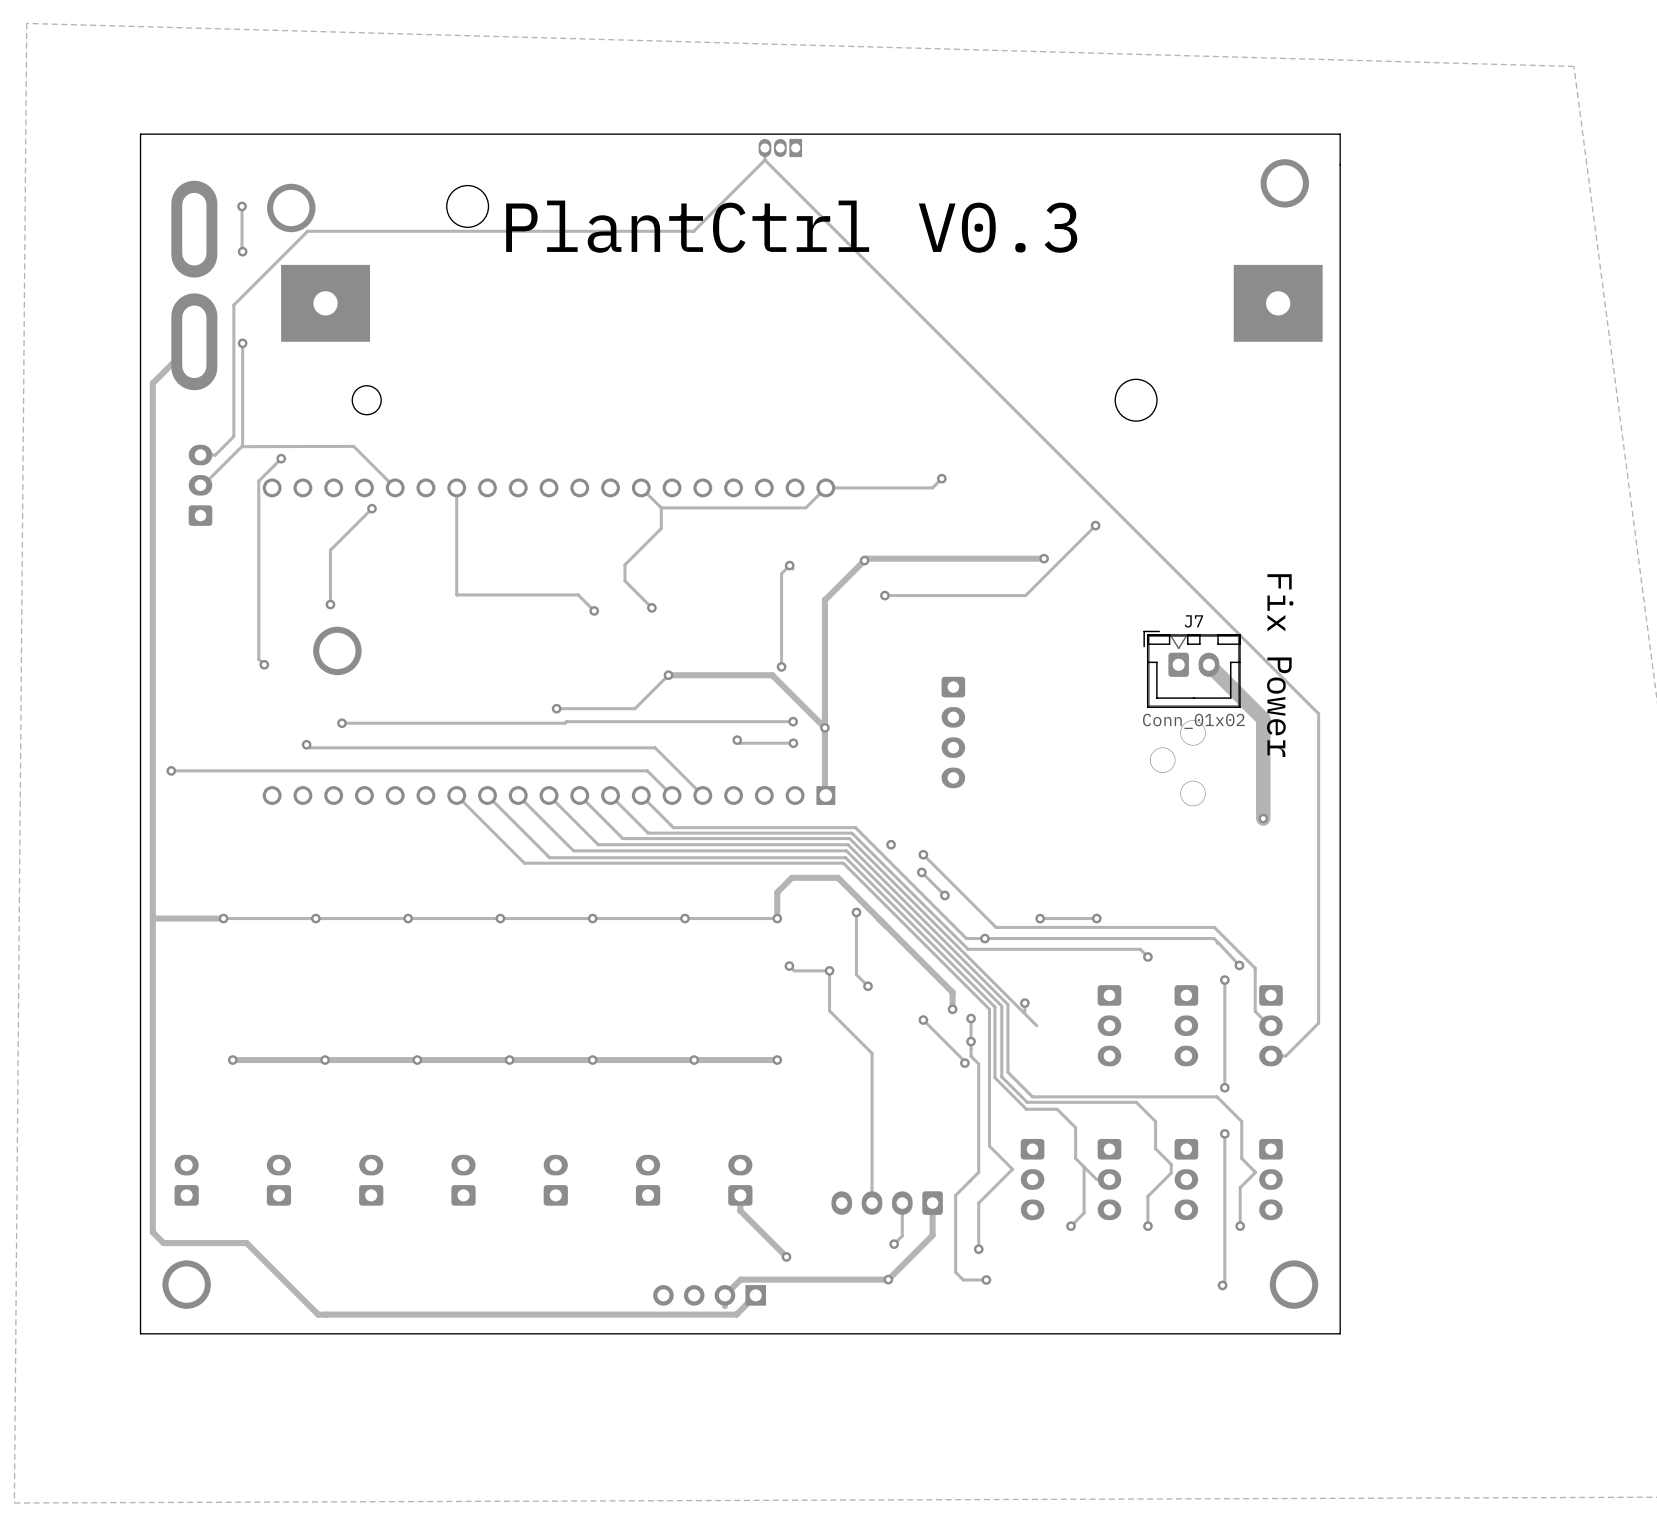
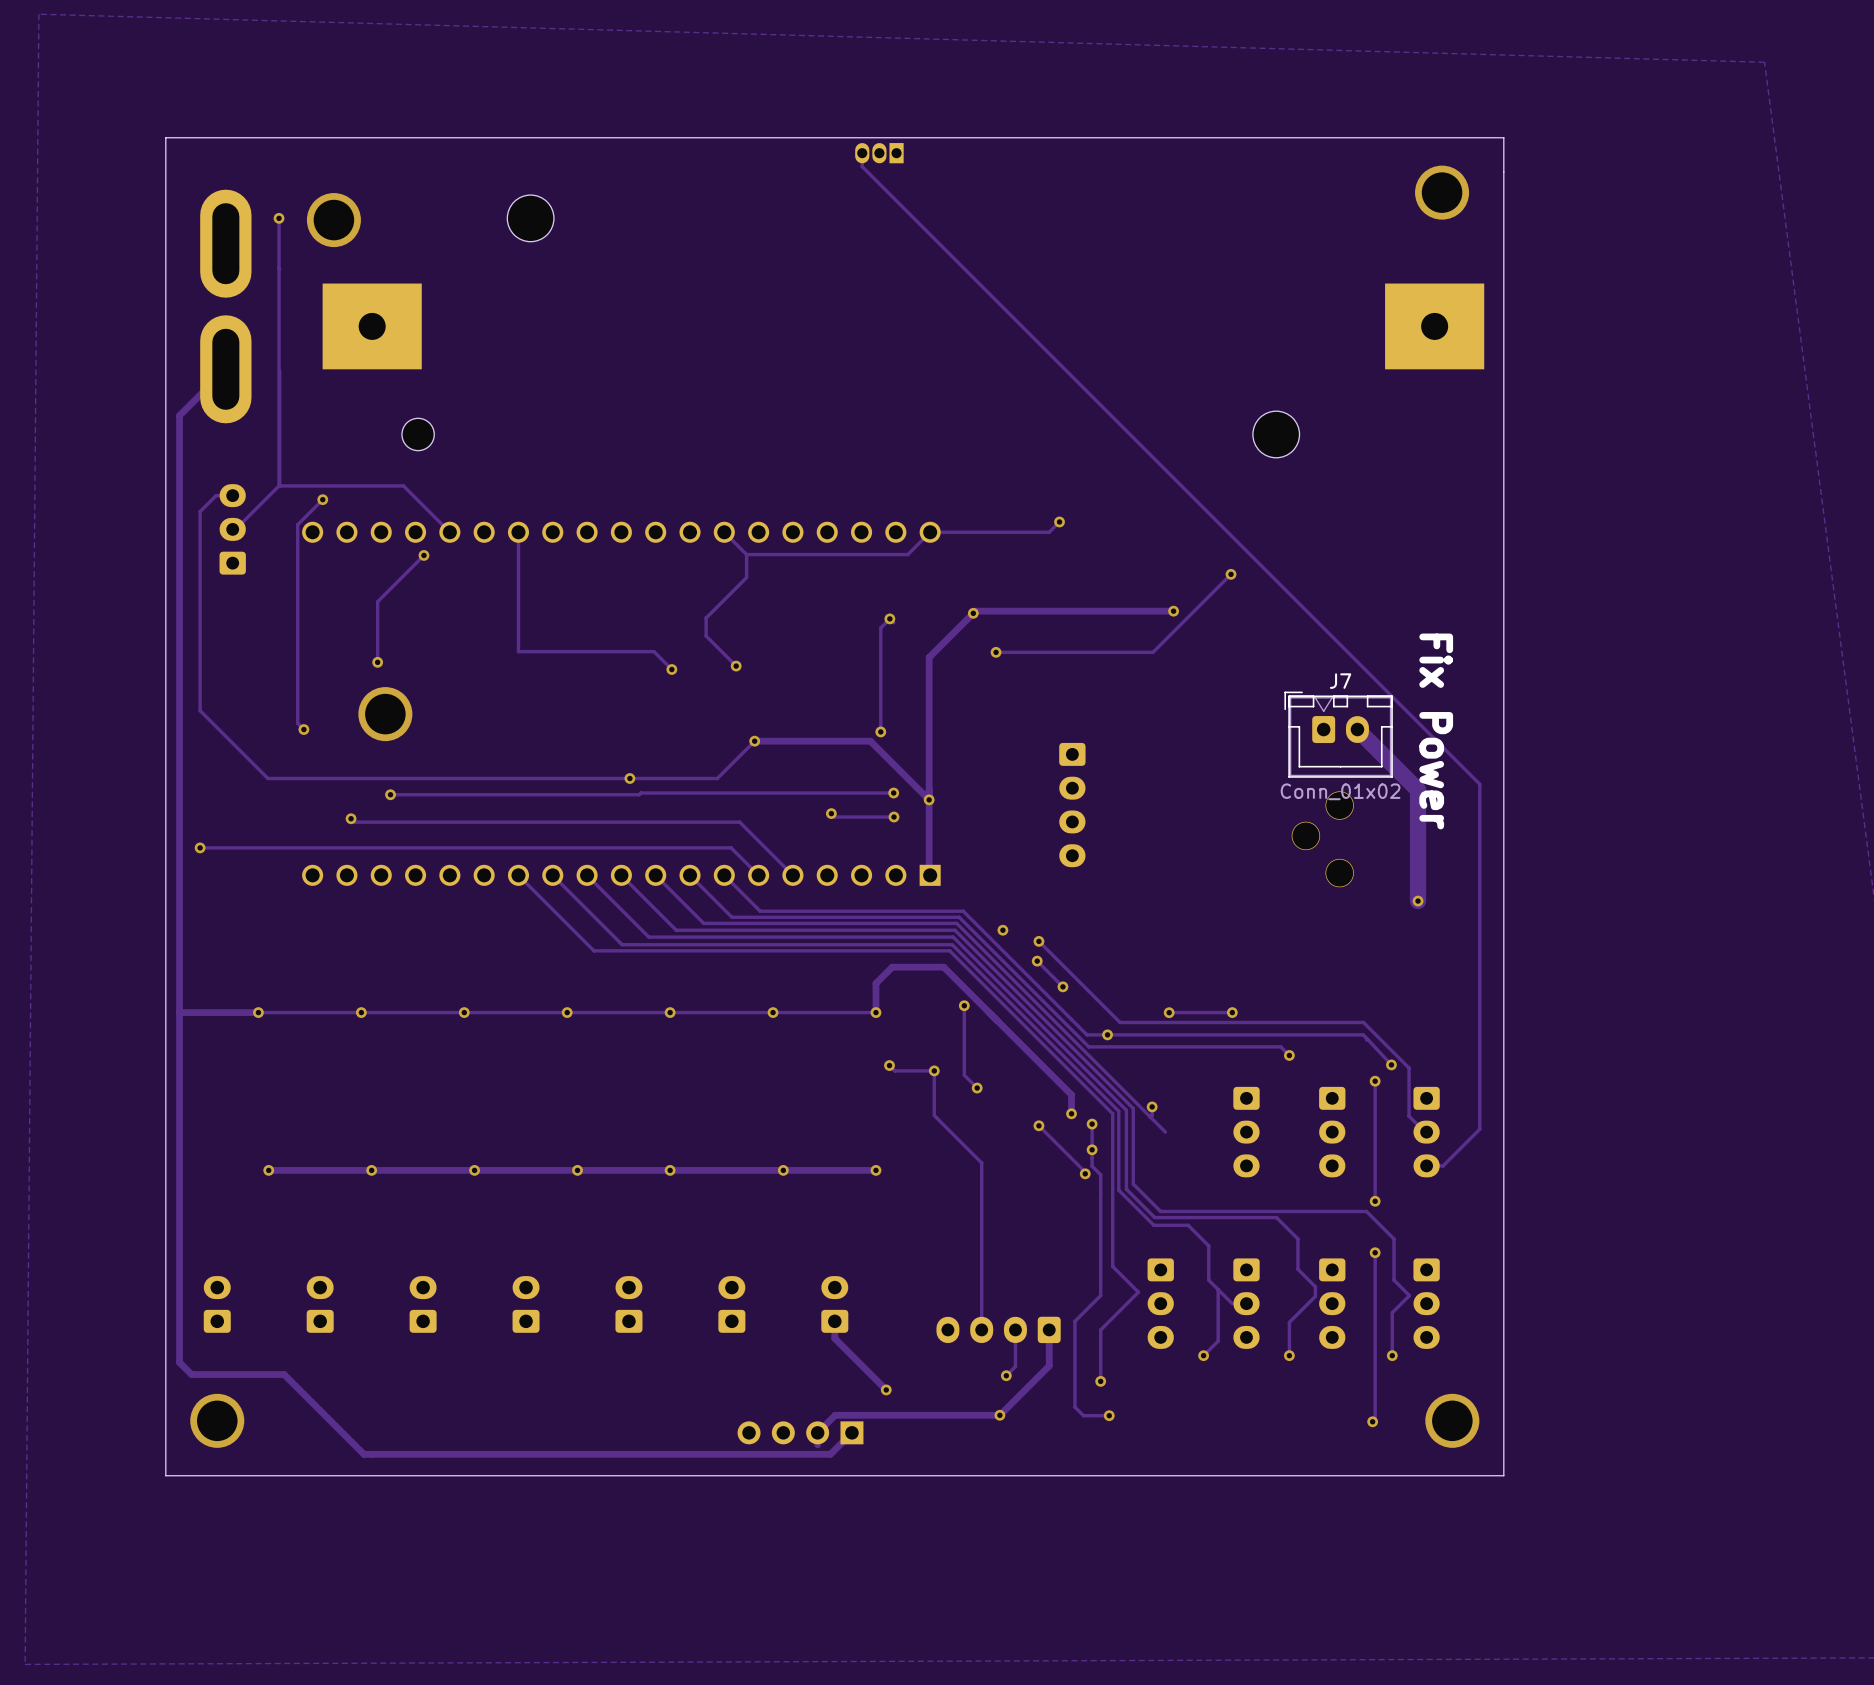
track: (764, 160) (693, 231) (307, 231) (233, 305) (233, 436) (215, 455) (200, 455) -> (629, 778) (267, 778) (200, 710) (200, 511) (216, 495) (232, 495)
text: PlantCtrl V0.3 (791, 226) -> none
via: (242, 251) -> none
via: (242, 343) -> none
track: (353, 446) (242, 446) -> (403, 485) (279, 485) (279, 268)

